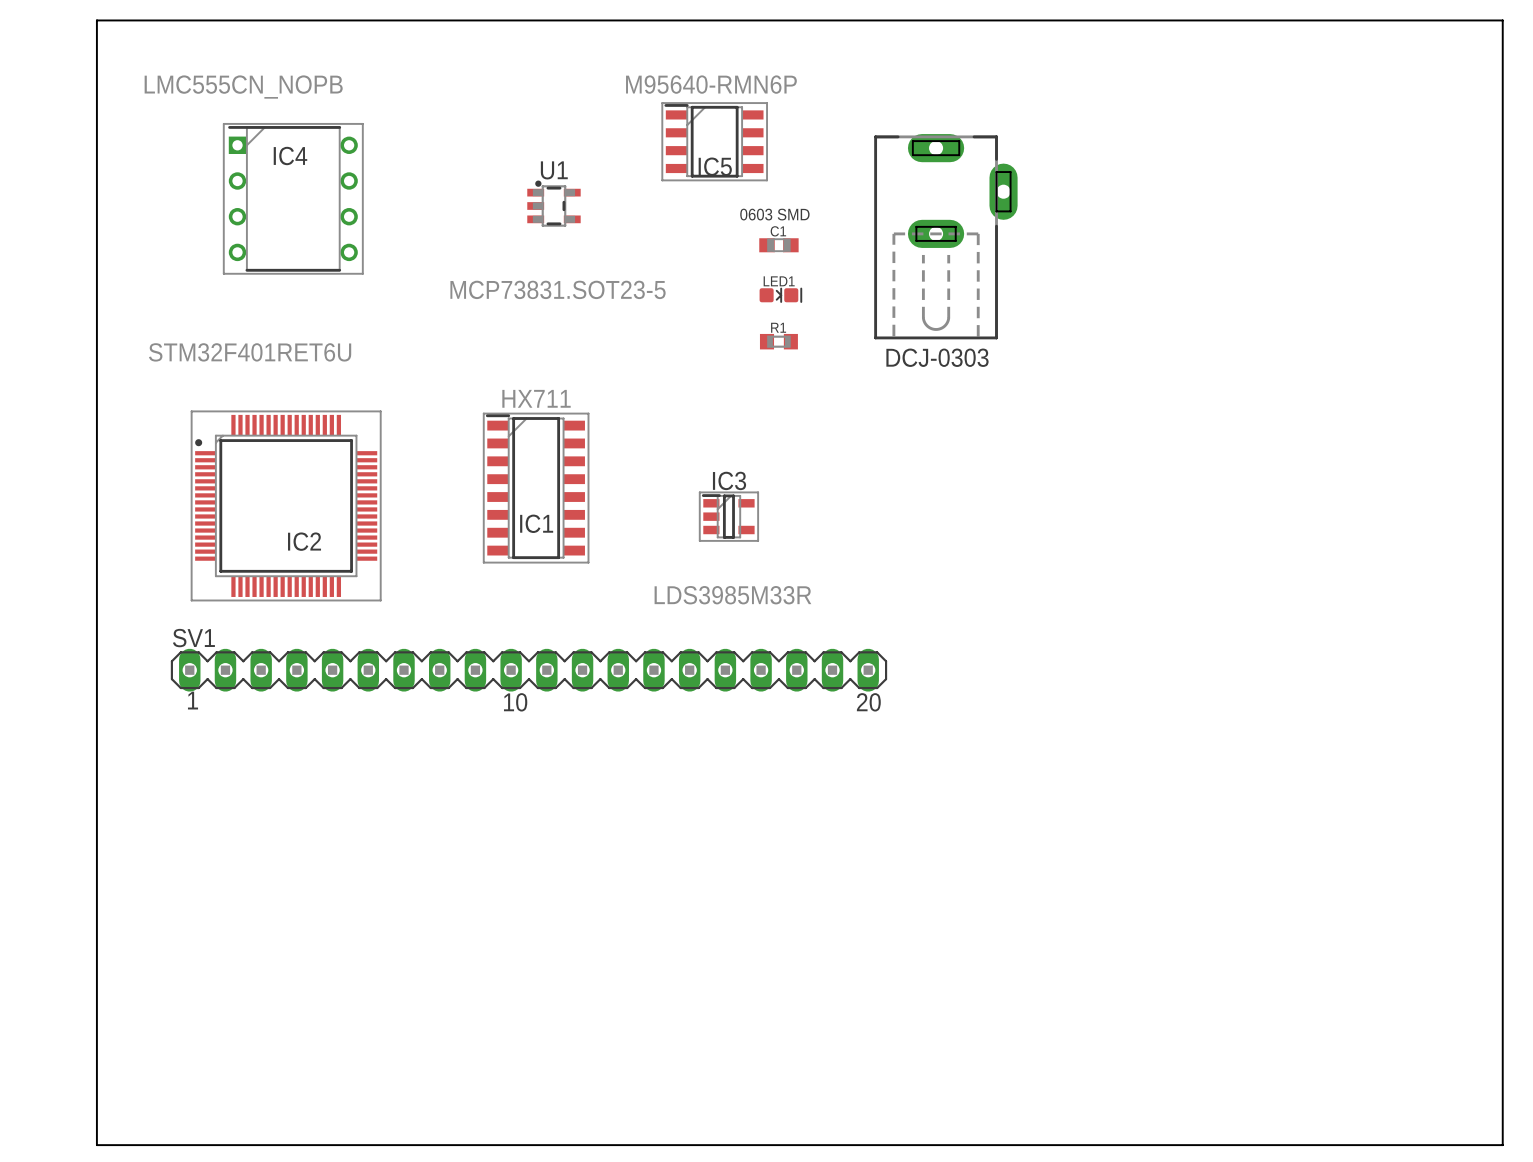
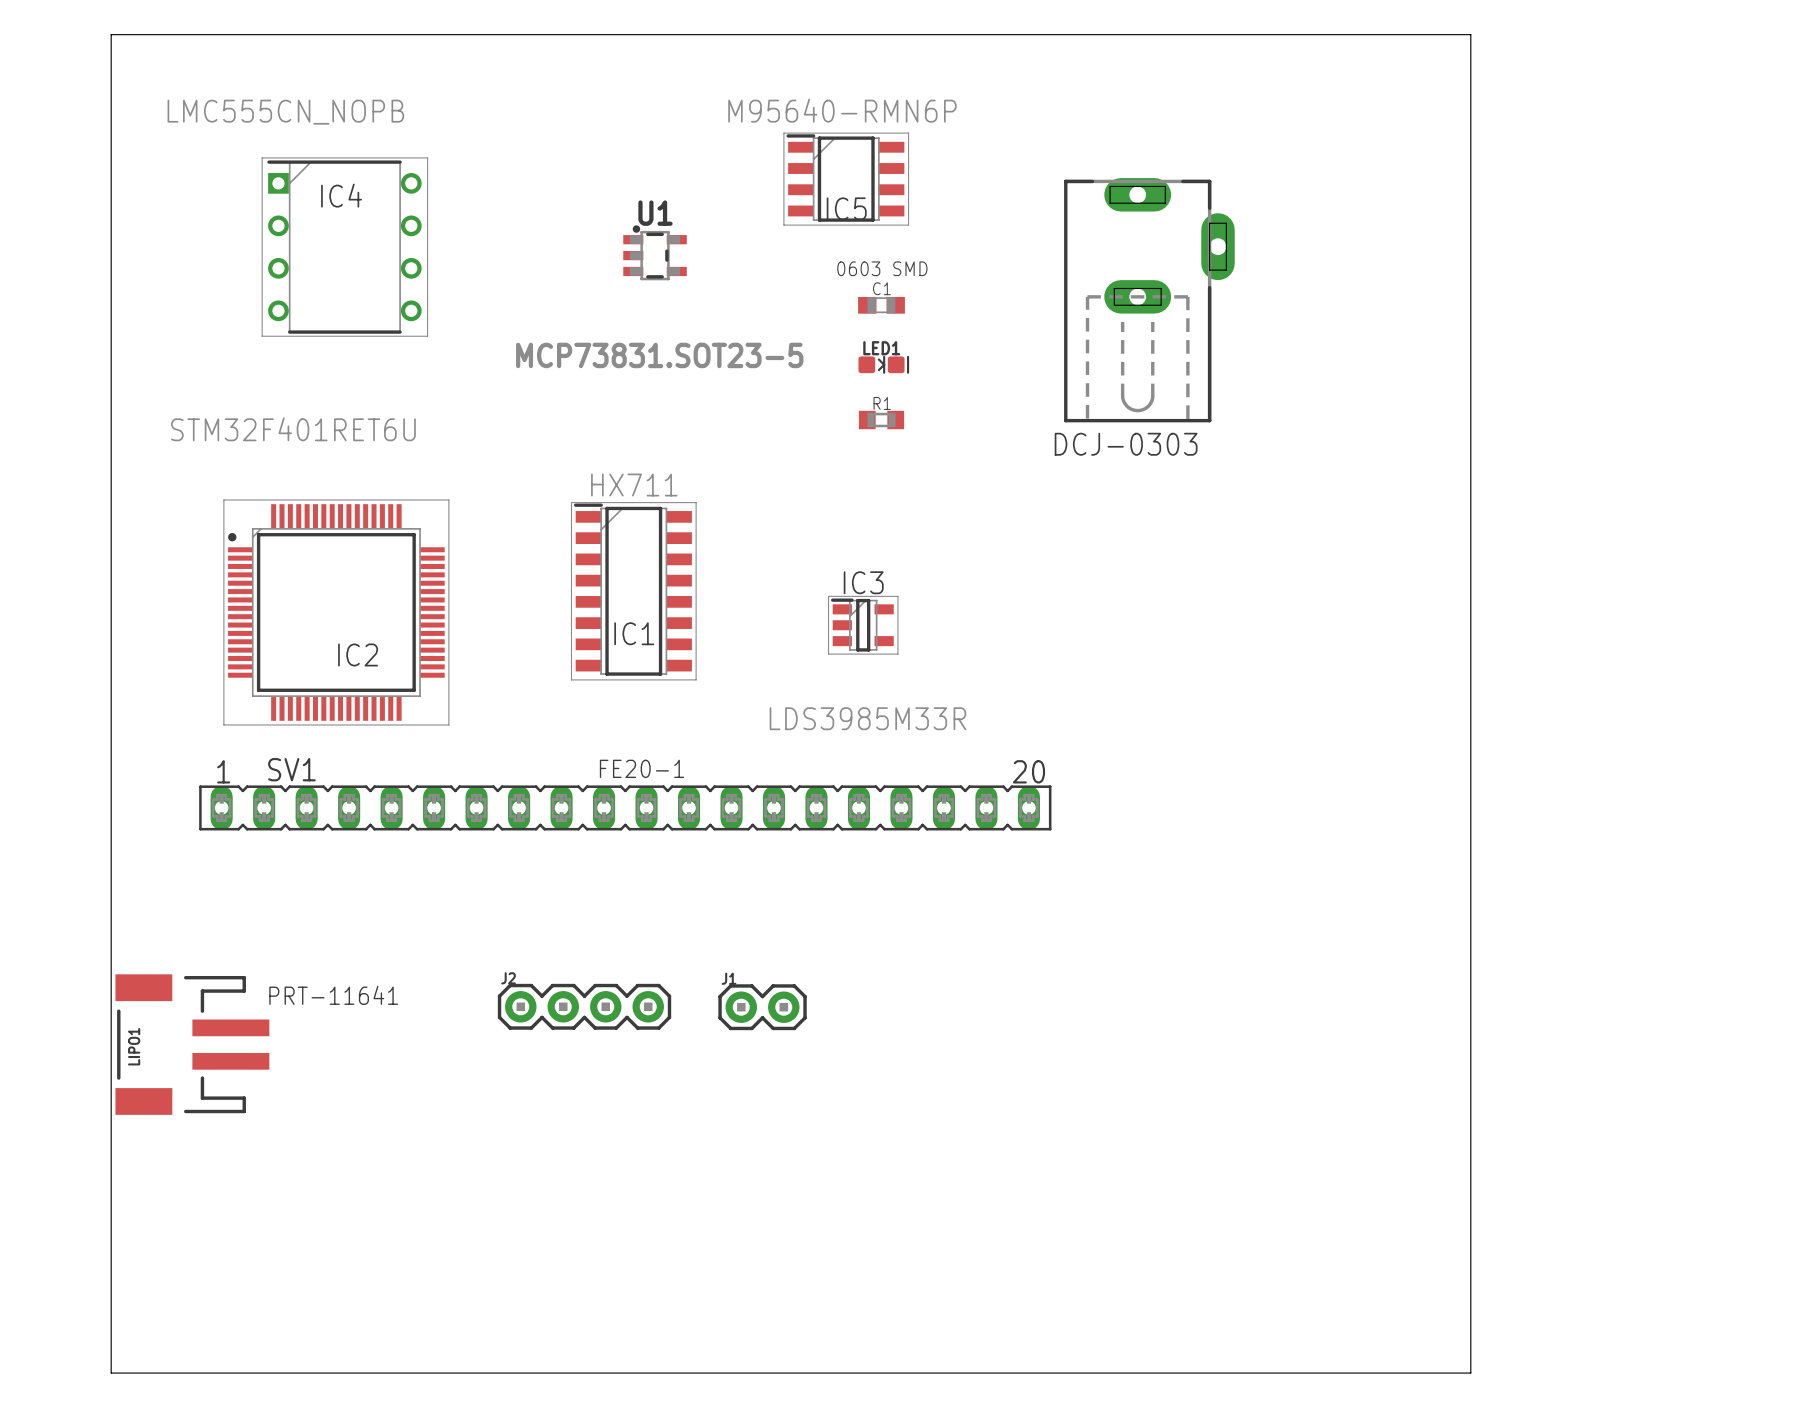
board edge: (96, 20) (1502, 20) (1502, 1145) (1239, 1145) -> (111, 34) (1470, 34) (1470, 1373)
text position: 0603 SMD (774, 214) -> 0603 SMD (882, 268)
DCJ-0303 position: (945, 236) -> (1149, 300)
C1 position: (778, 245) -> (881, 305)
LED1 position: (780, 295) -> (883, 364)
R1 position: (778, 341) -> (881, 420)
text: none -> FE20-1 (642, 768)
SV1 name position: SV1 (193, 638) -> SV1 (291, 769)
SV1 footprint: [170, 648, 888, 692] -> [199, 785, 1052, 831]
text: none -> PRT-11641 (333, 995)
J2: none -> (584, 1006)
J1: none -> (762, 1007)
LIPO1: none -> (192, 1044)

